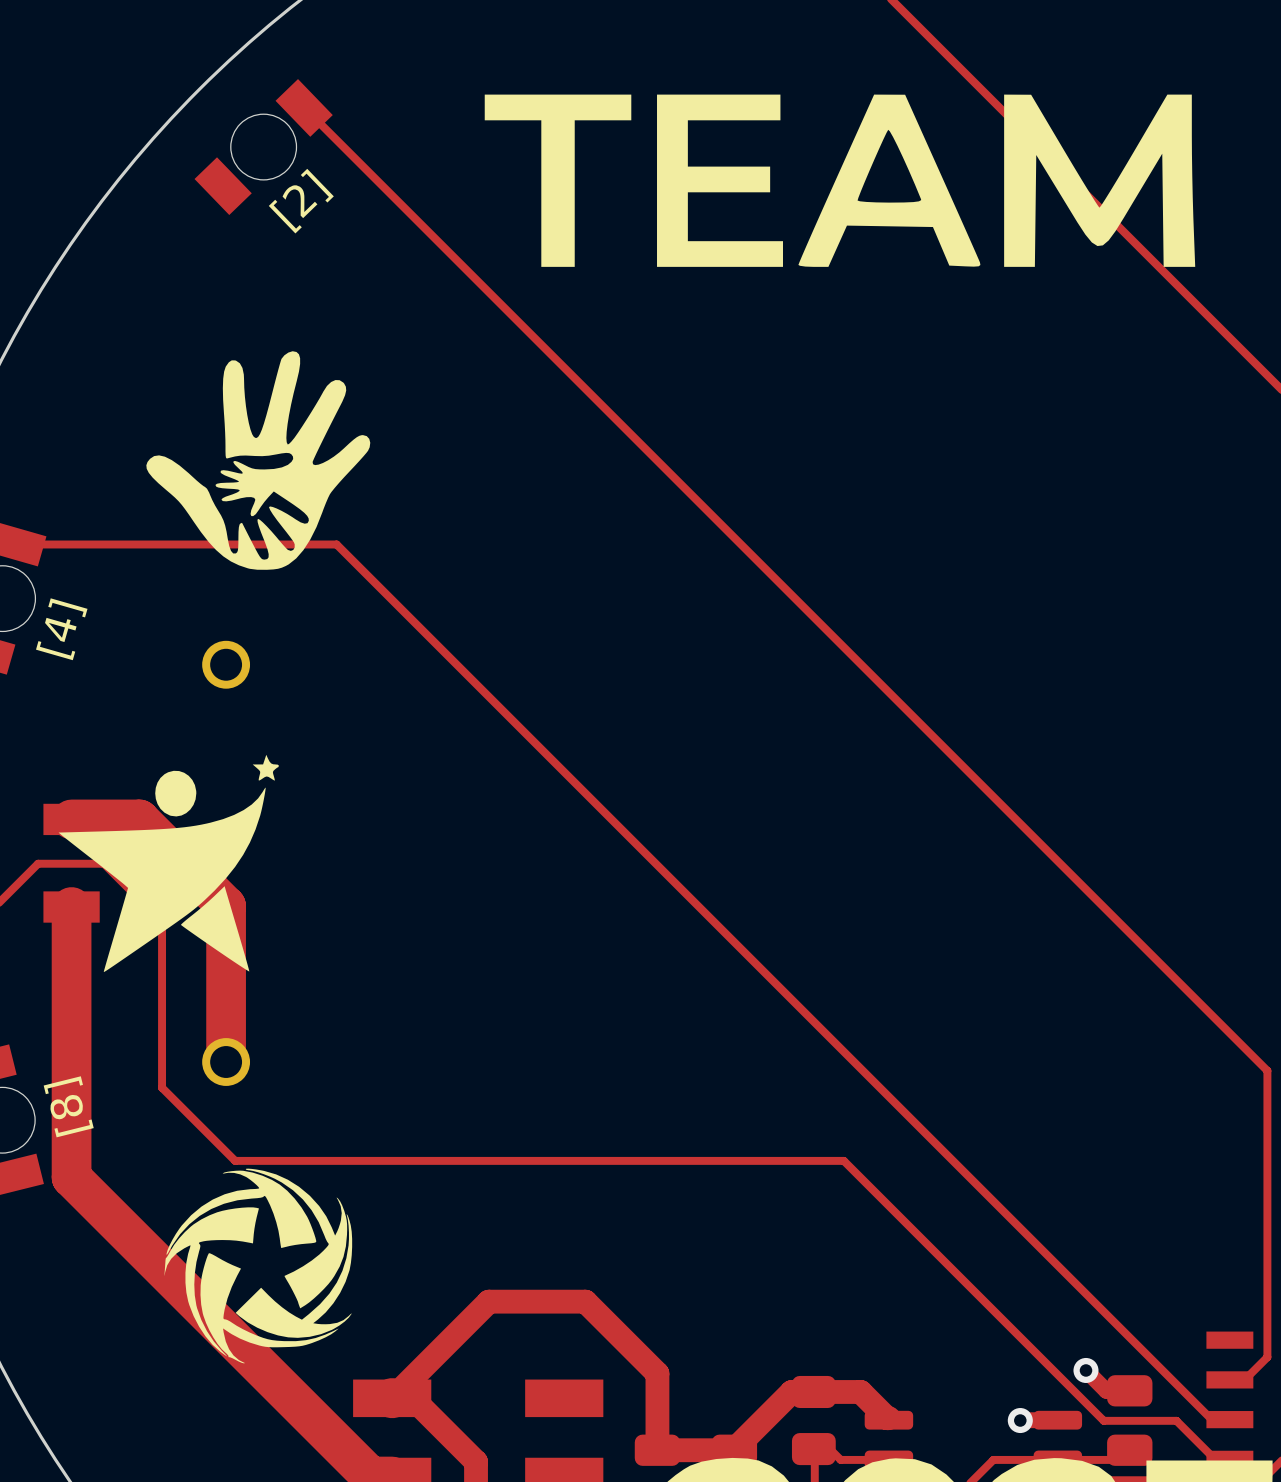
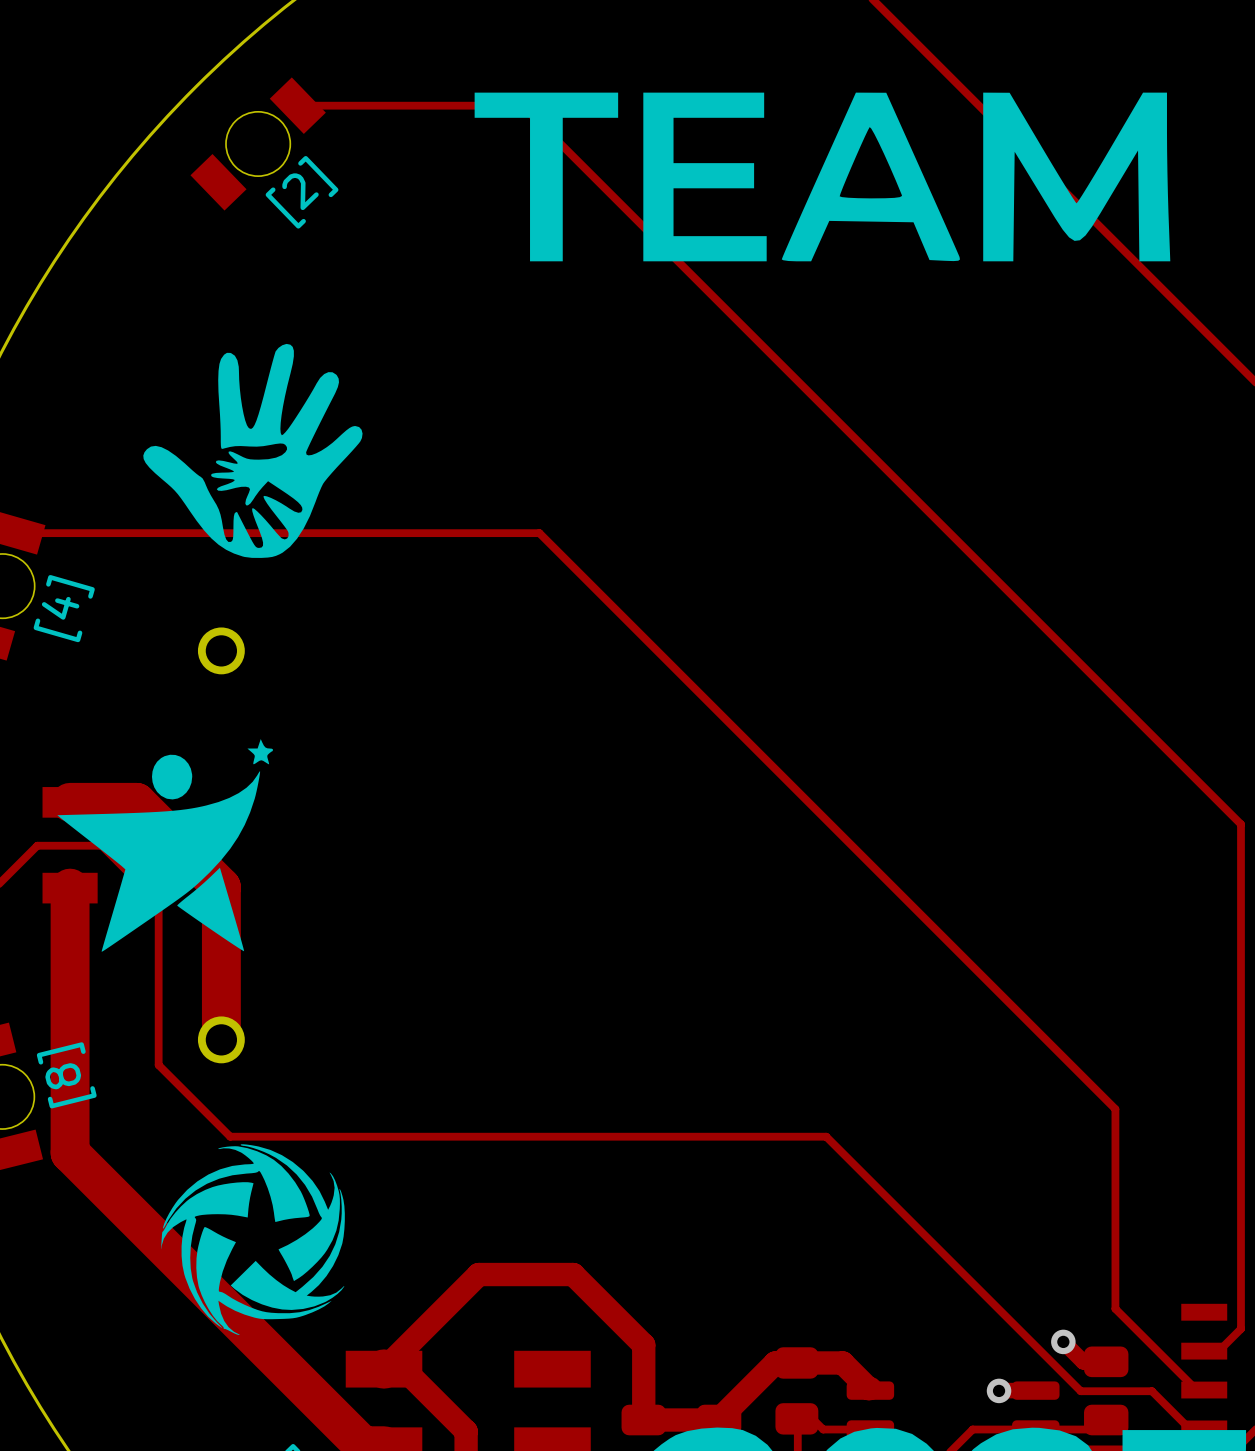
top track: (304, 107) (1267, 1070) -> (298, 105) (522, 105) (1240, 824) (1240, 1048)
top track: (336, 544) (1211, 1419) (1222, 1419) -> (329, 533) (539, 533) (1115, 1109) (1115, 1308) (1196, 1390)

